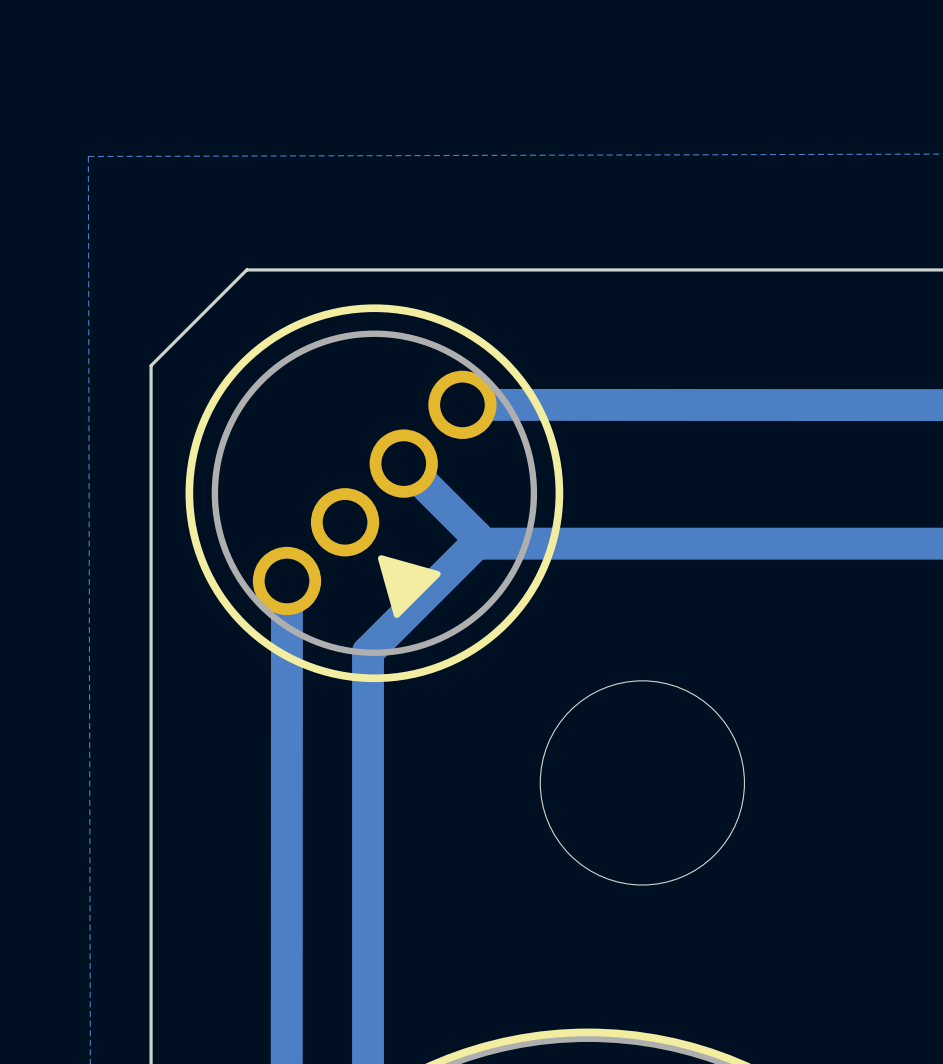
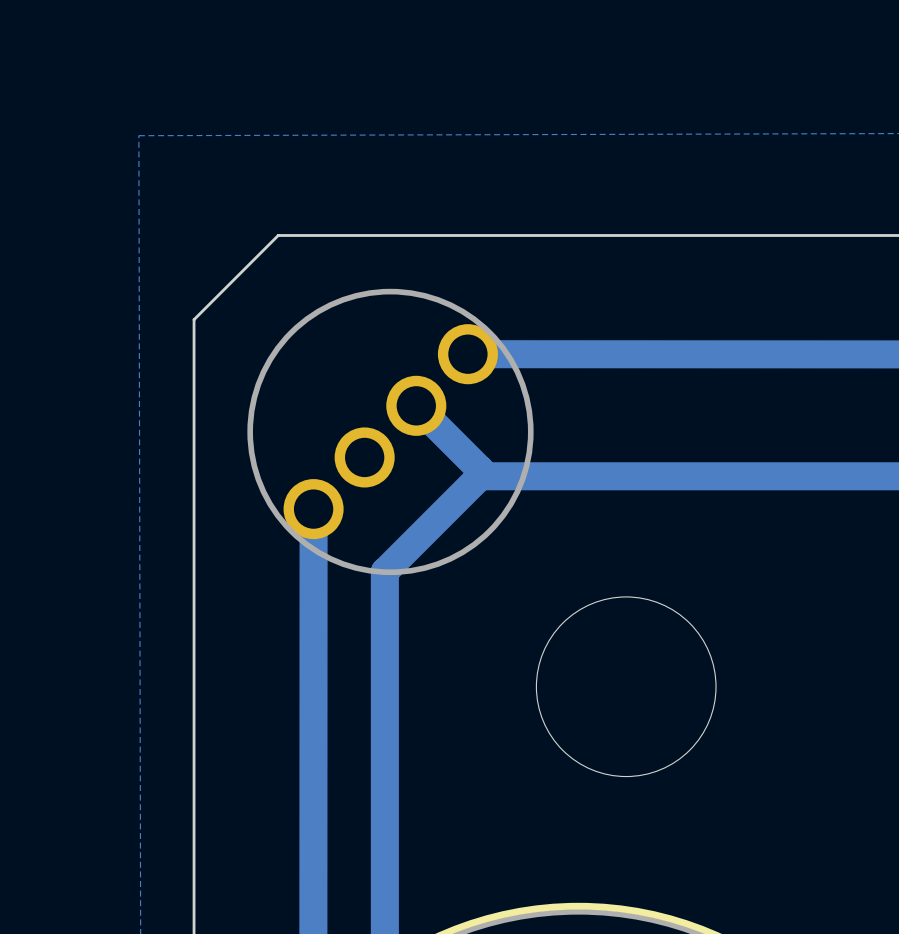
part footprint: [185, 304, 564, 683] -> [247, 288, 534, 576]

